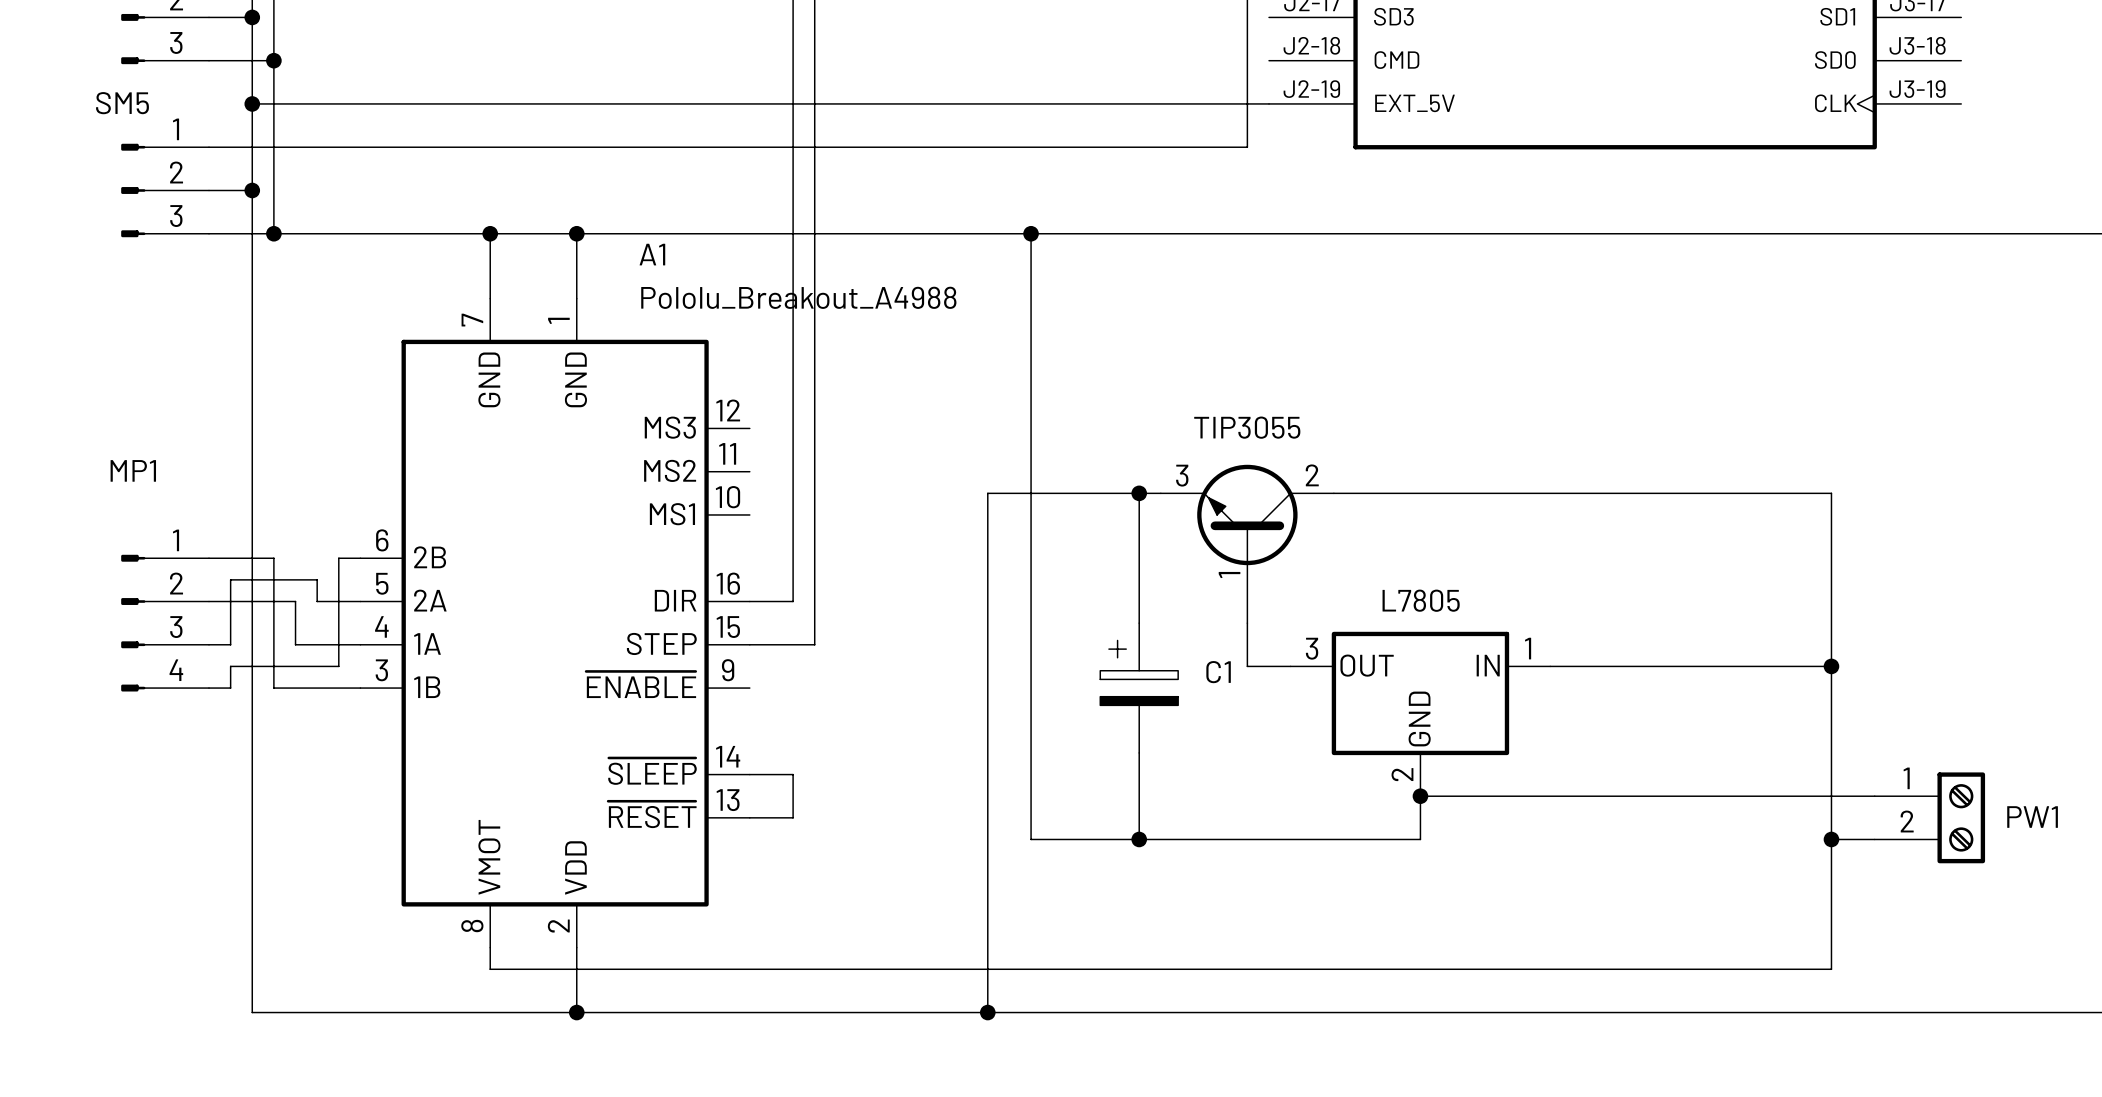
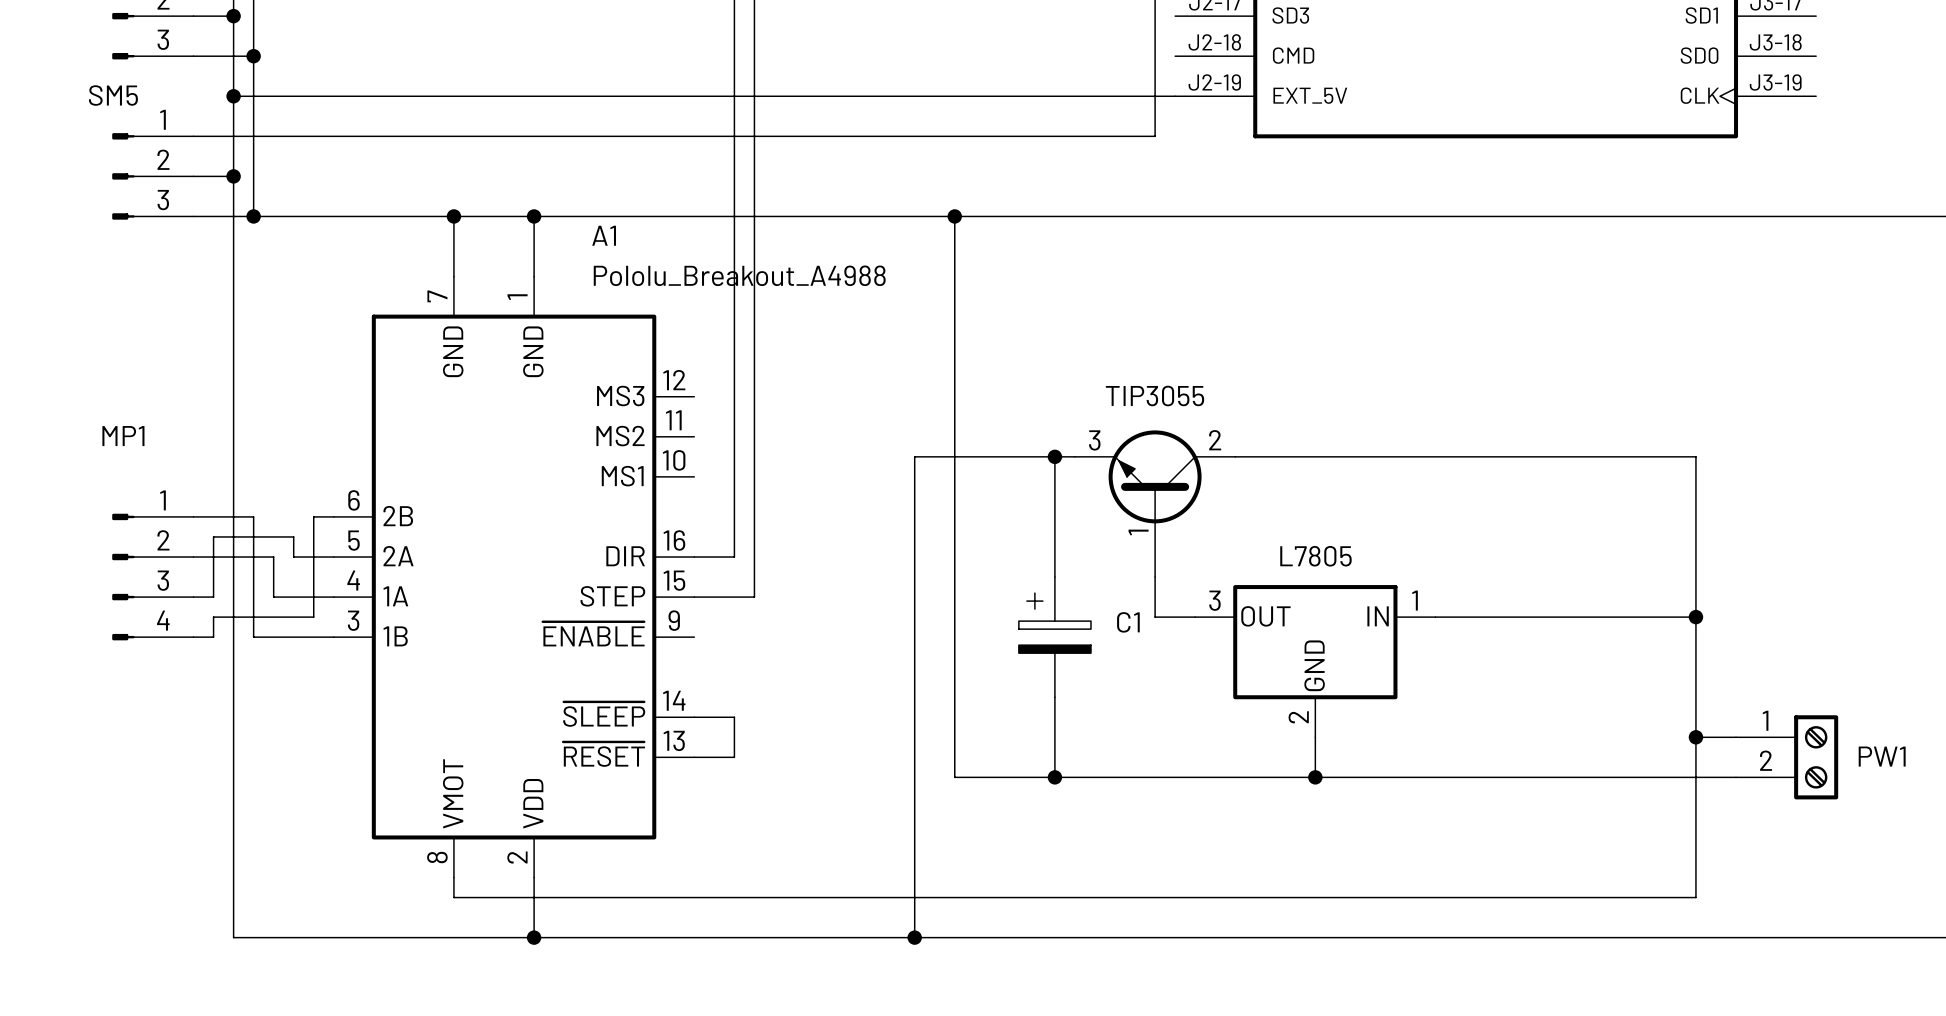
wire: (1420, 796) (1831, 796) -> (1315, 777) (1695, 777)
junction position: (1420, 796) -> (1315, 777)
junction position: (1831, 839) -> (1695, 737)

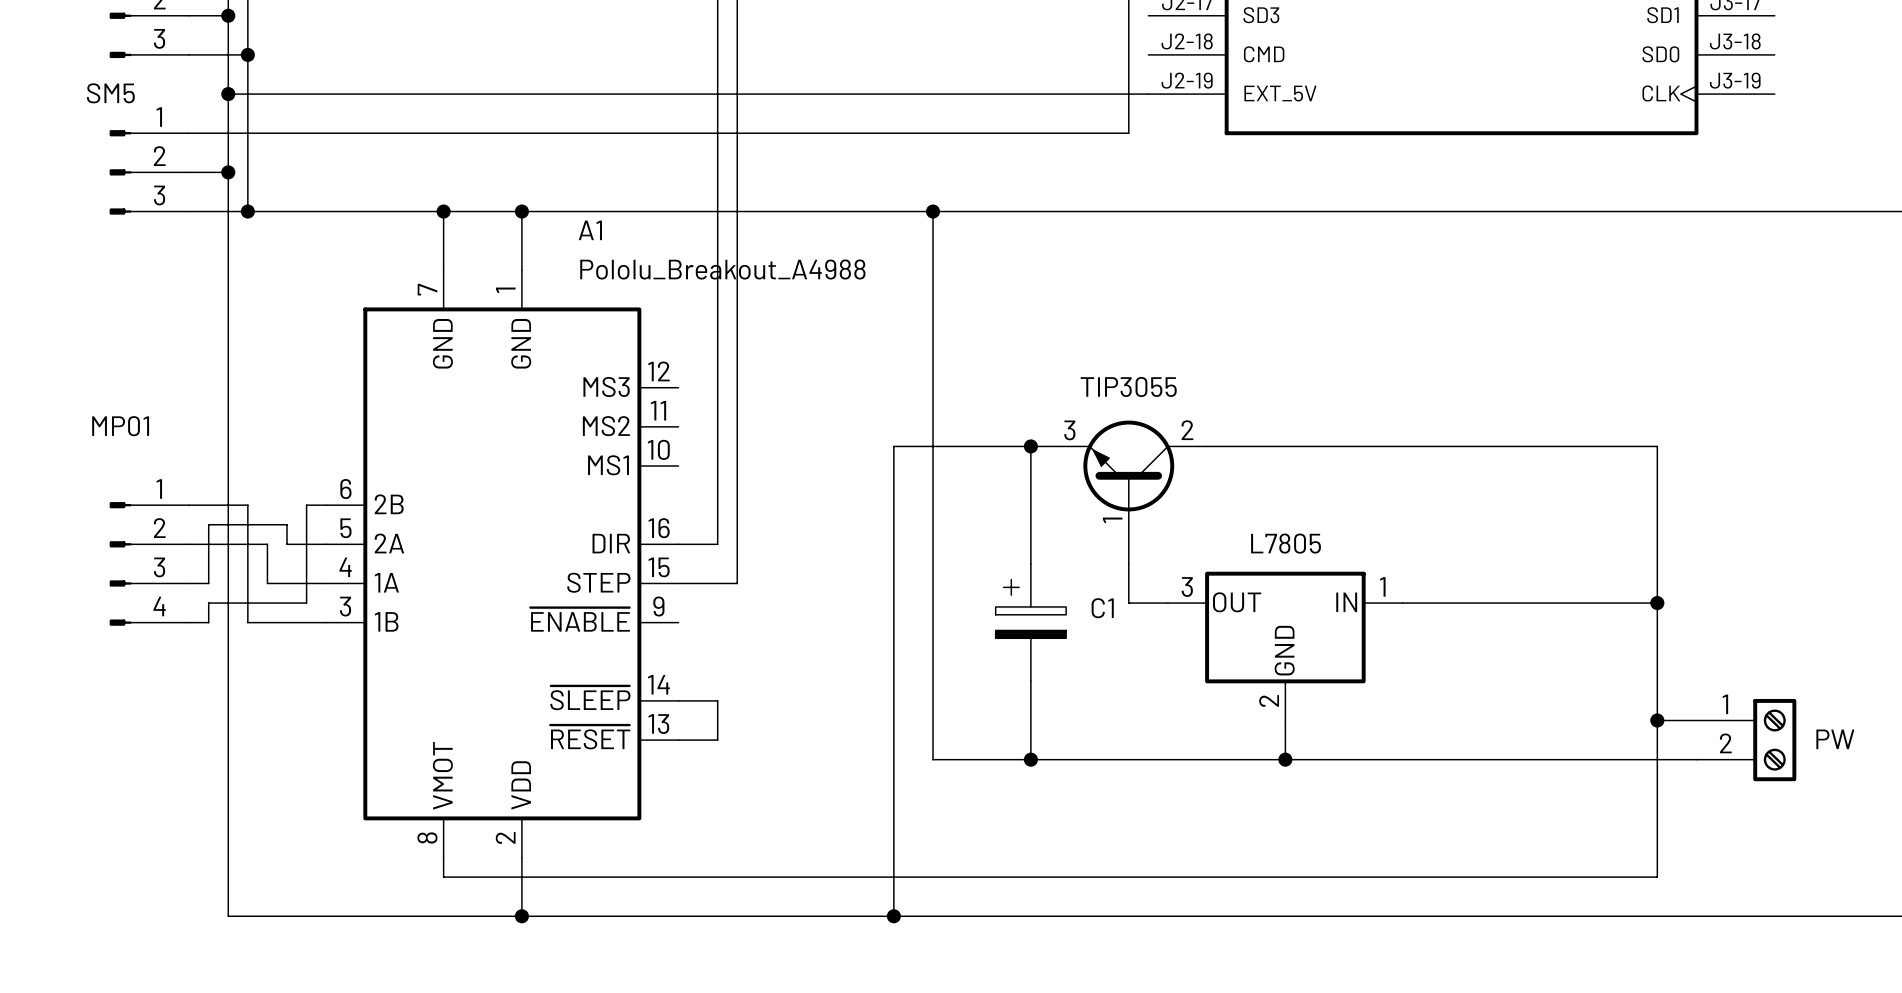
MP1 name: MP1 (123, 436) -> MP01 (120, 426)
PW1 name: PW1 (1882, 756) -> PW (1835, 739)

